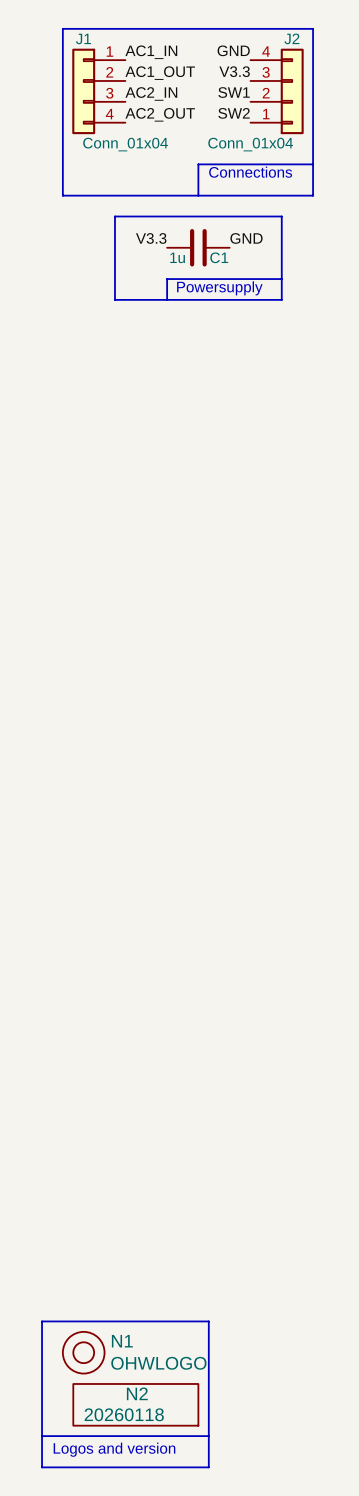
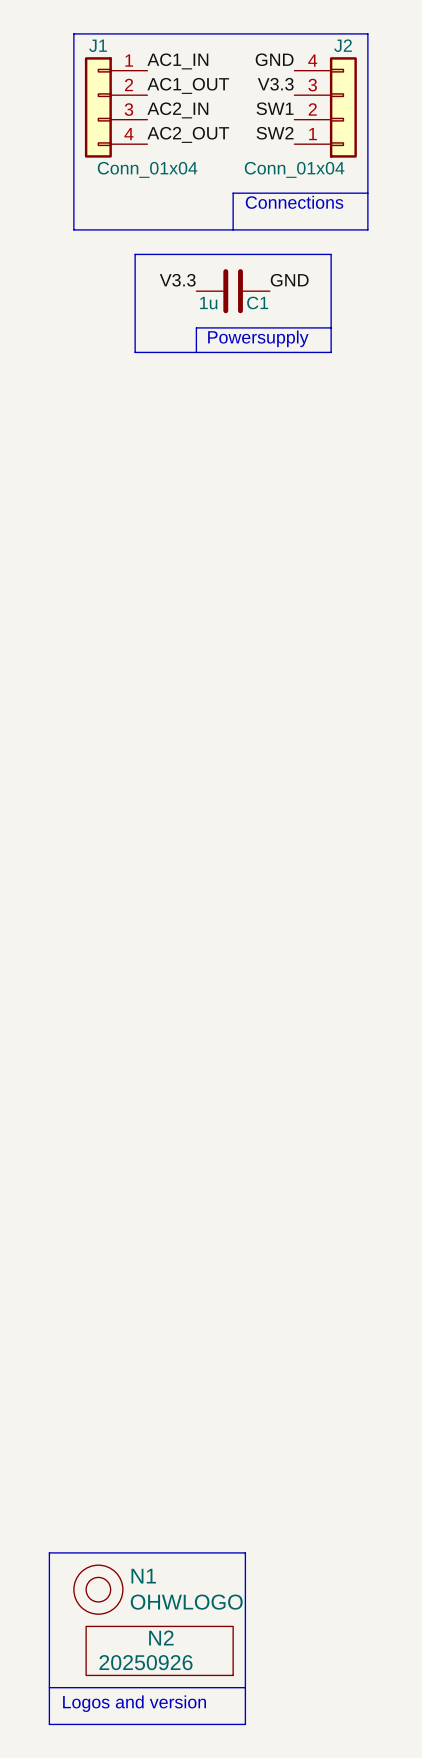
N2 value: 20260118 (124, 1414) -> 20250926 (145, 1662)

